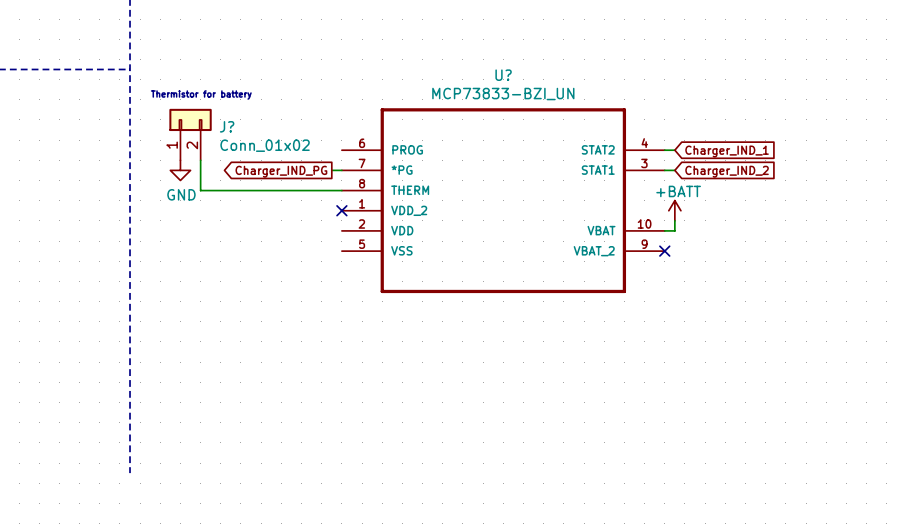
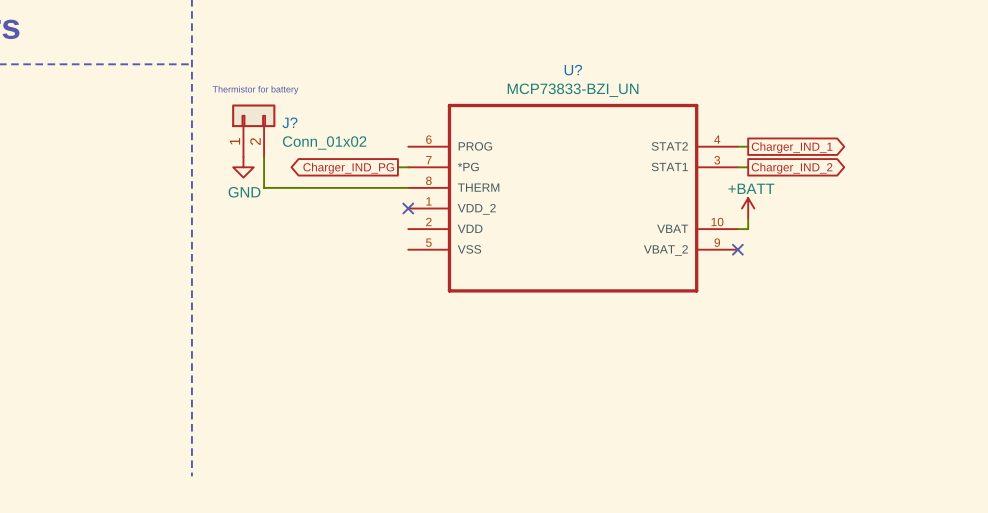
global label shape: input (727, 151) -> output (792, 147)
global label shape: input (727, 171) -> output (792, 168)

